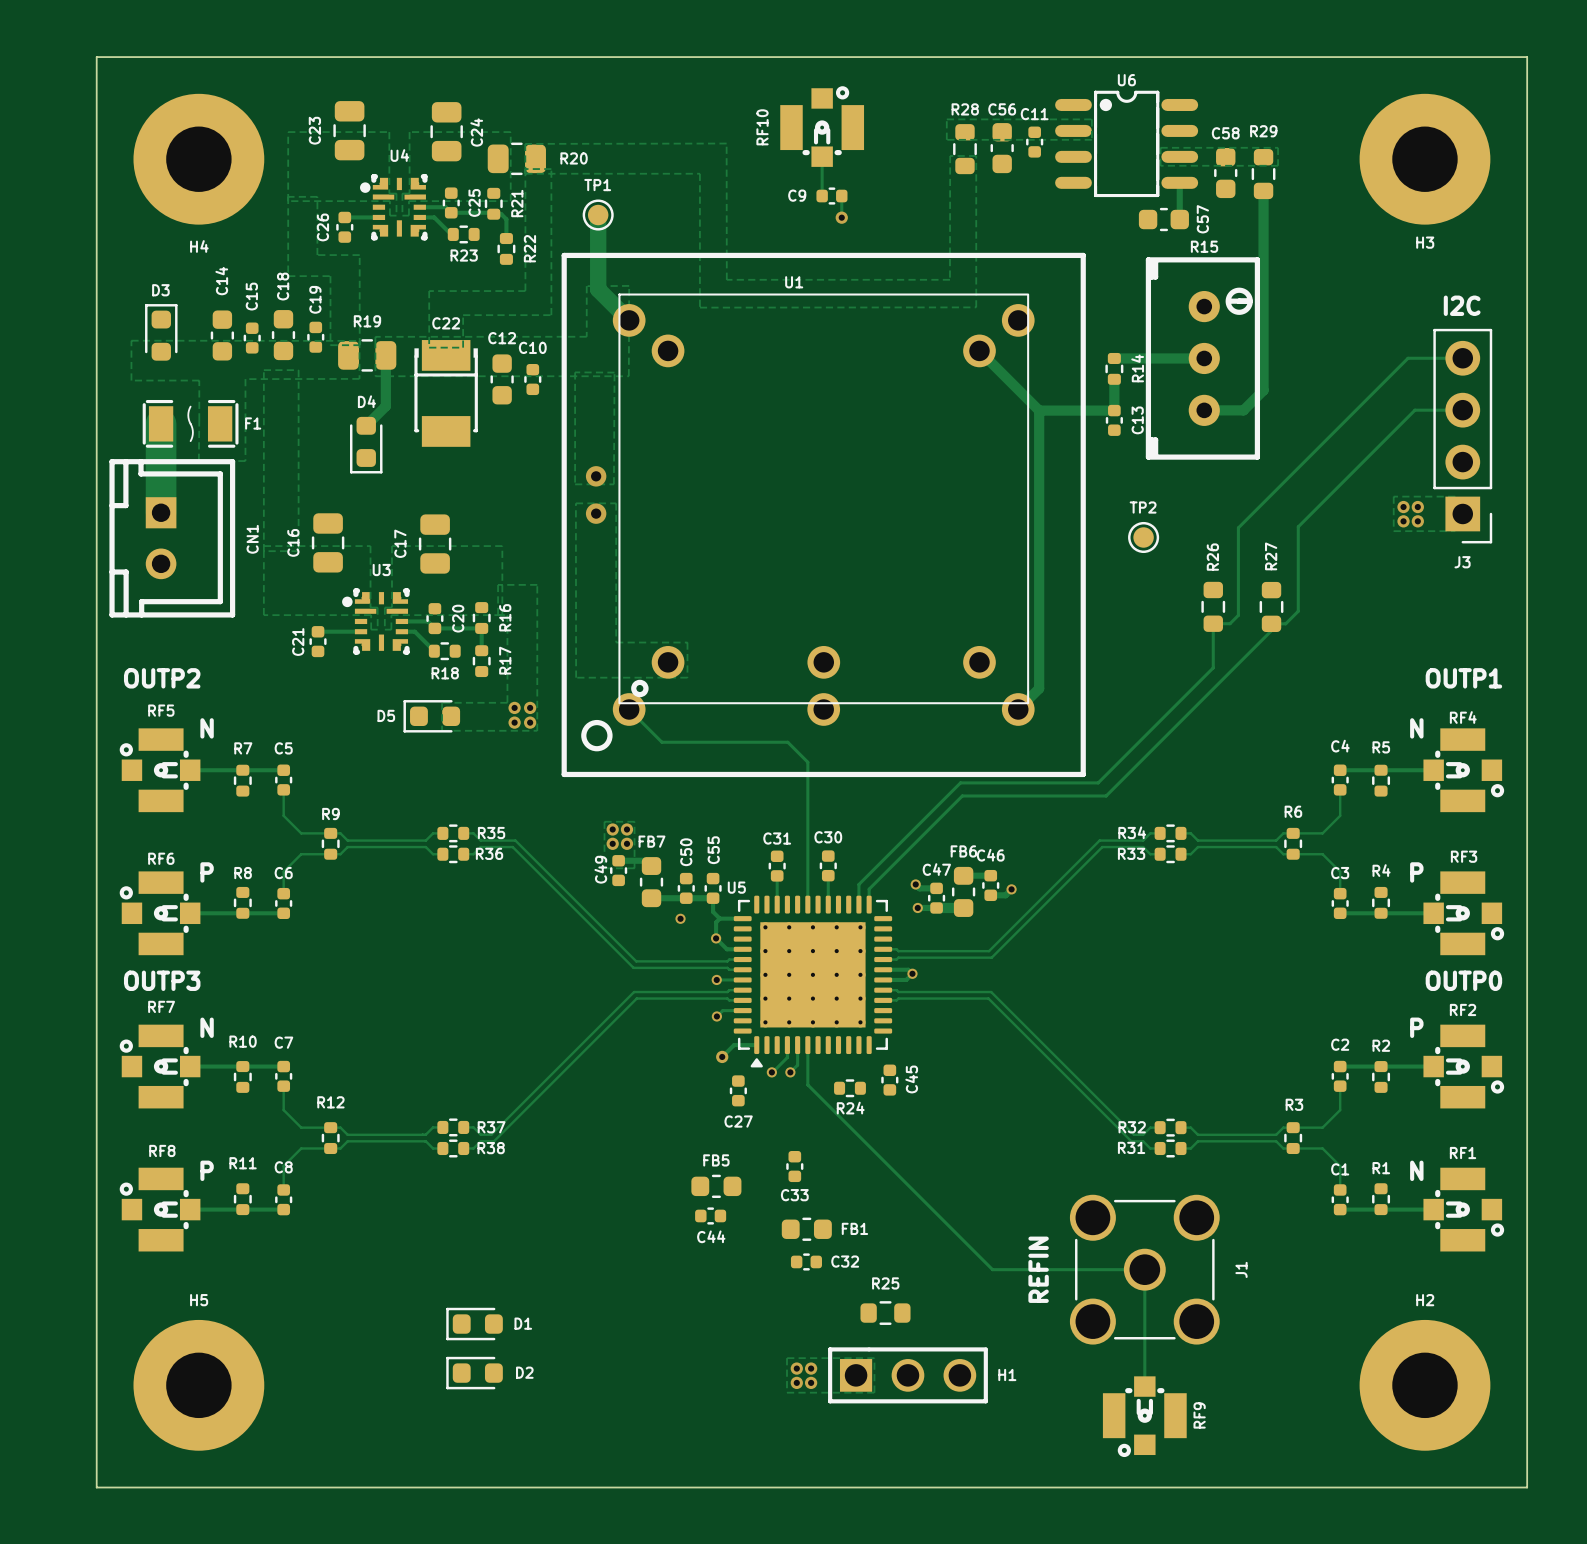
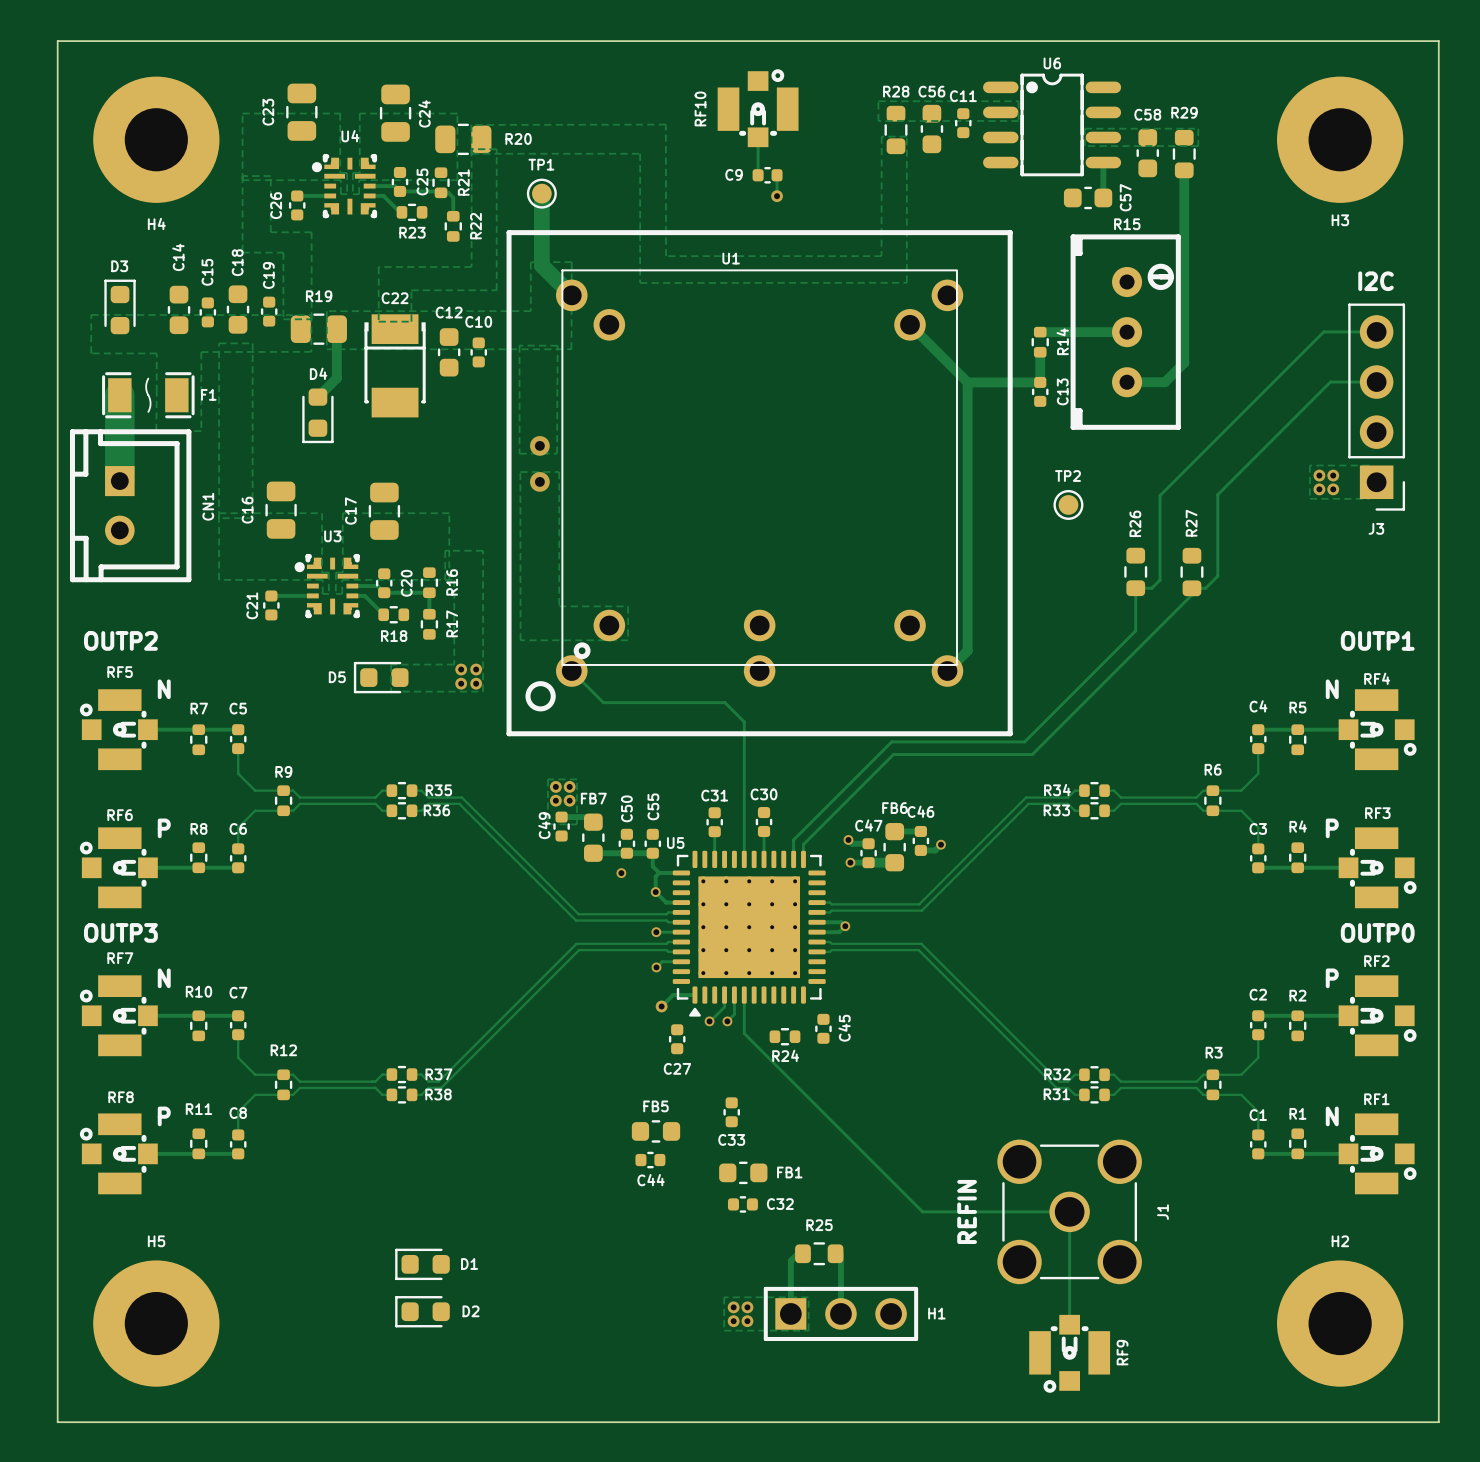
track: none -> (808, 1253) (797, 1253) (790, 1260) (790, 1313)
track: none -> (840, 1253) (840, 1313)

